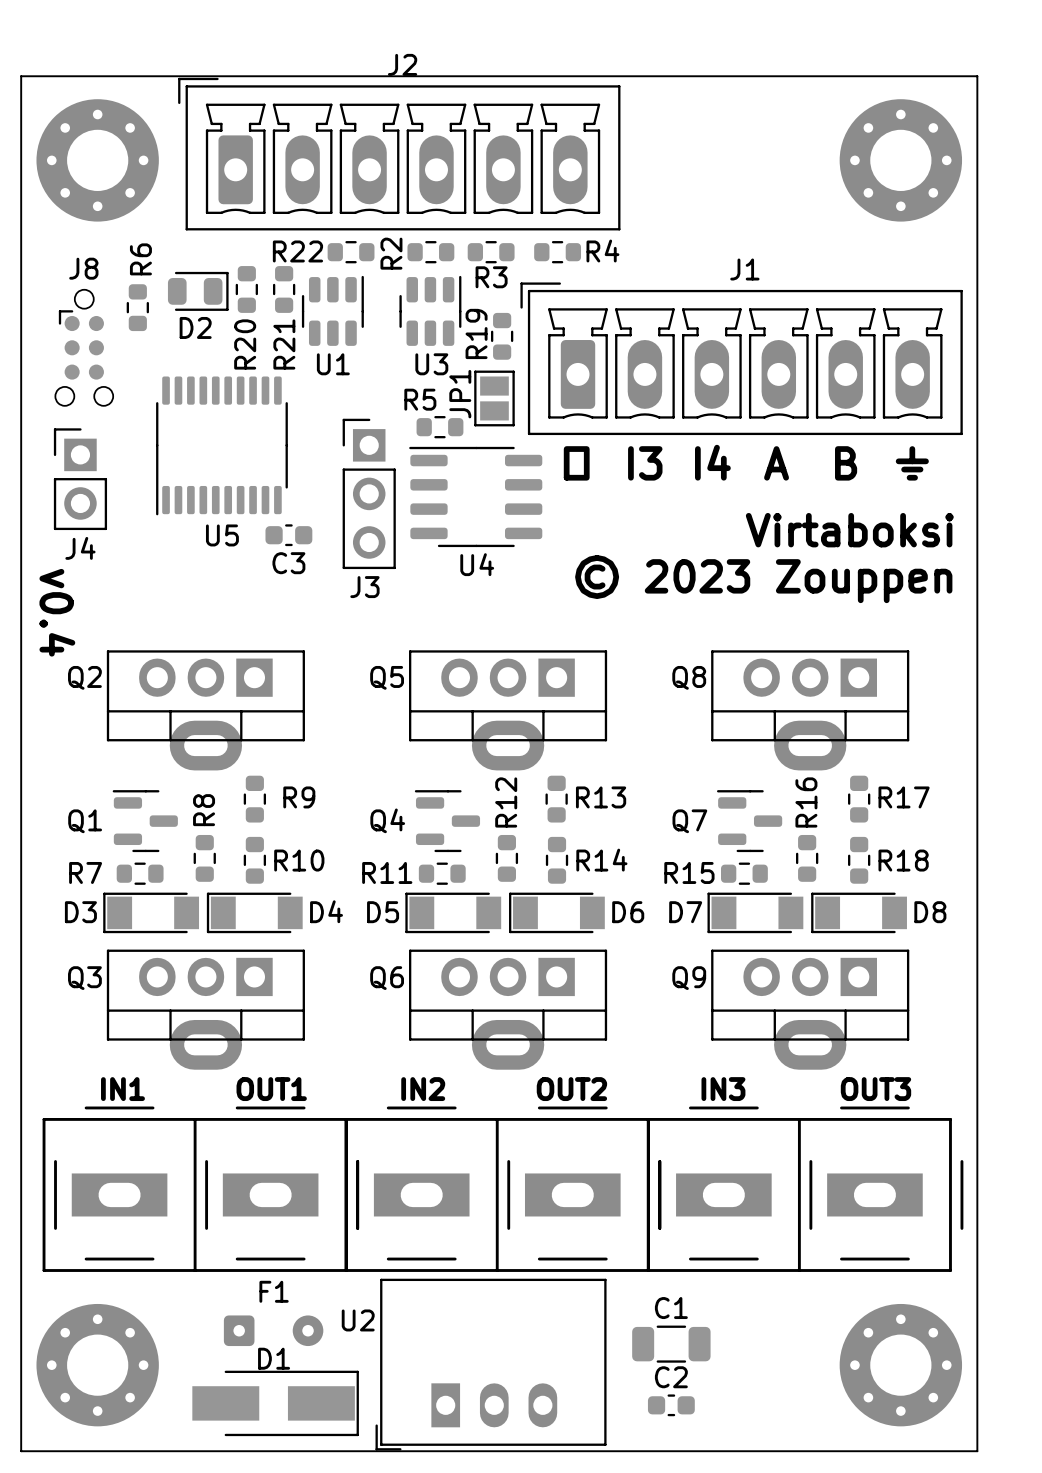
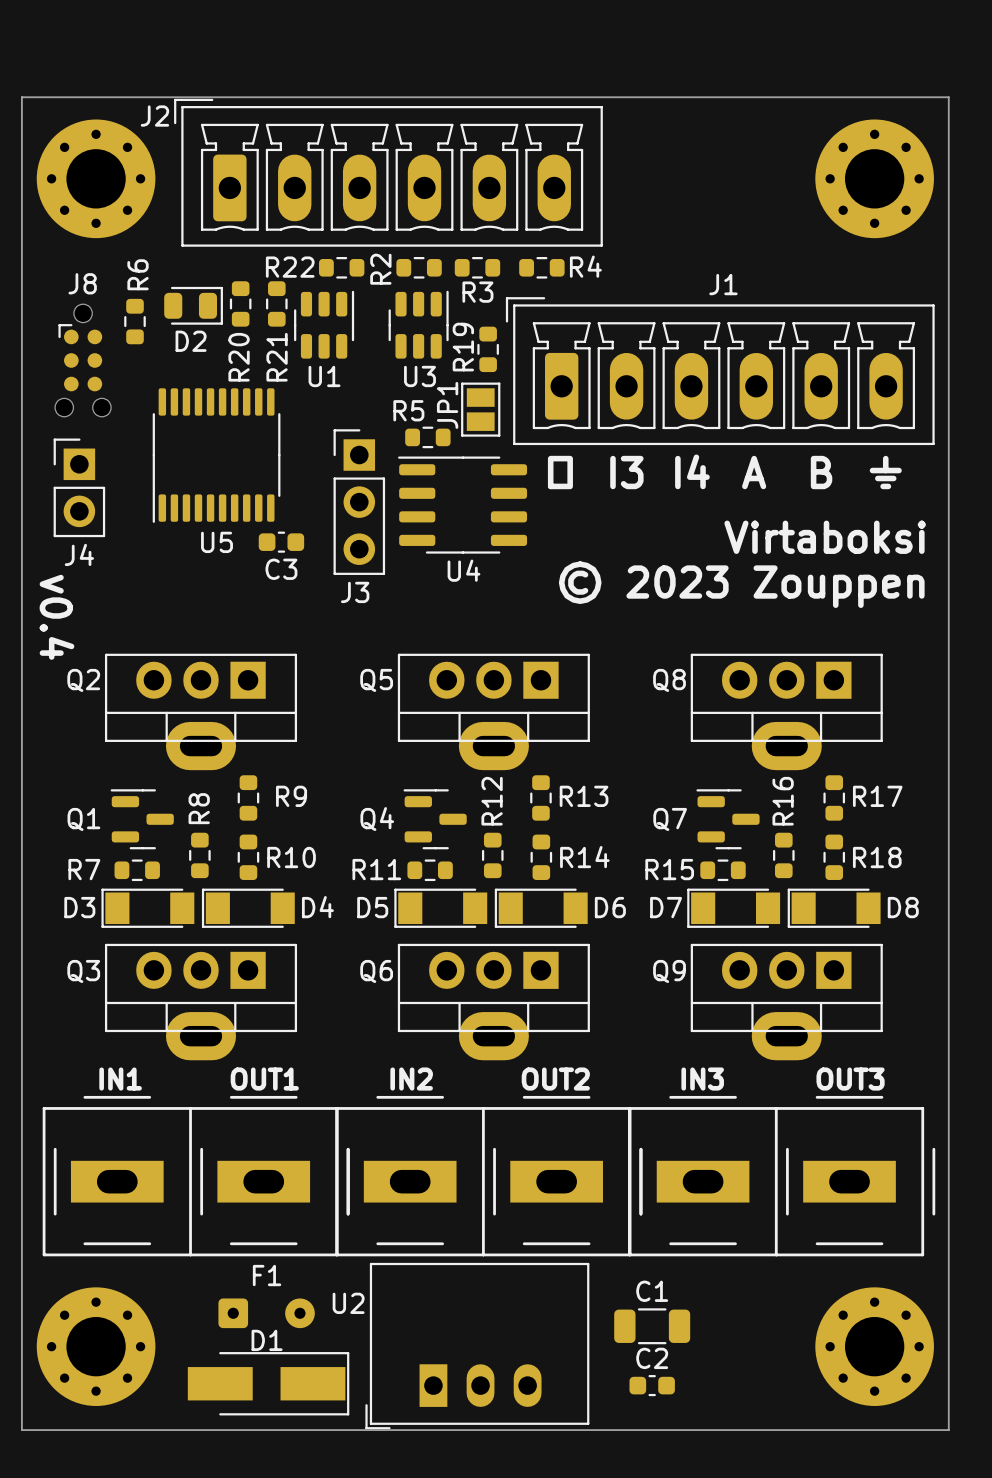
J2 name position: J2 (402, 64) -> J2 (154, 116)

